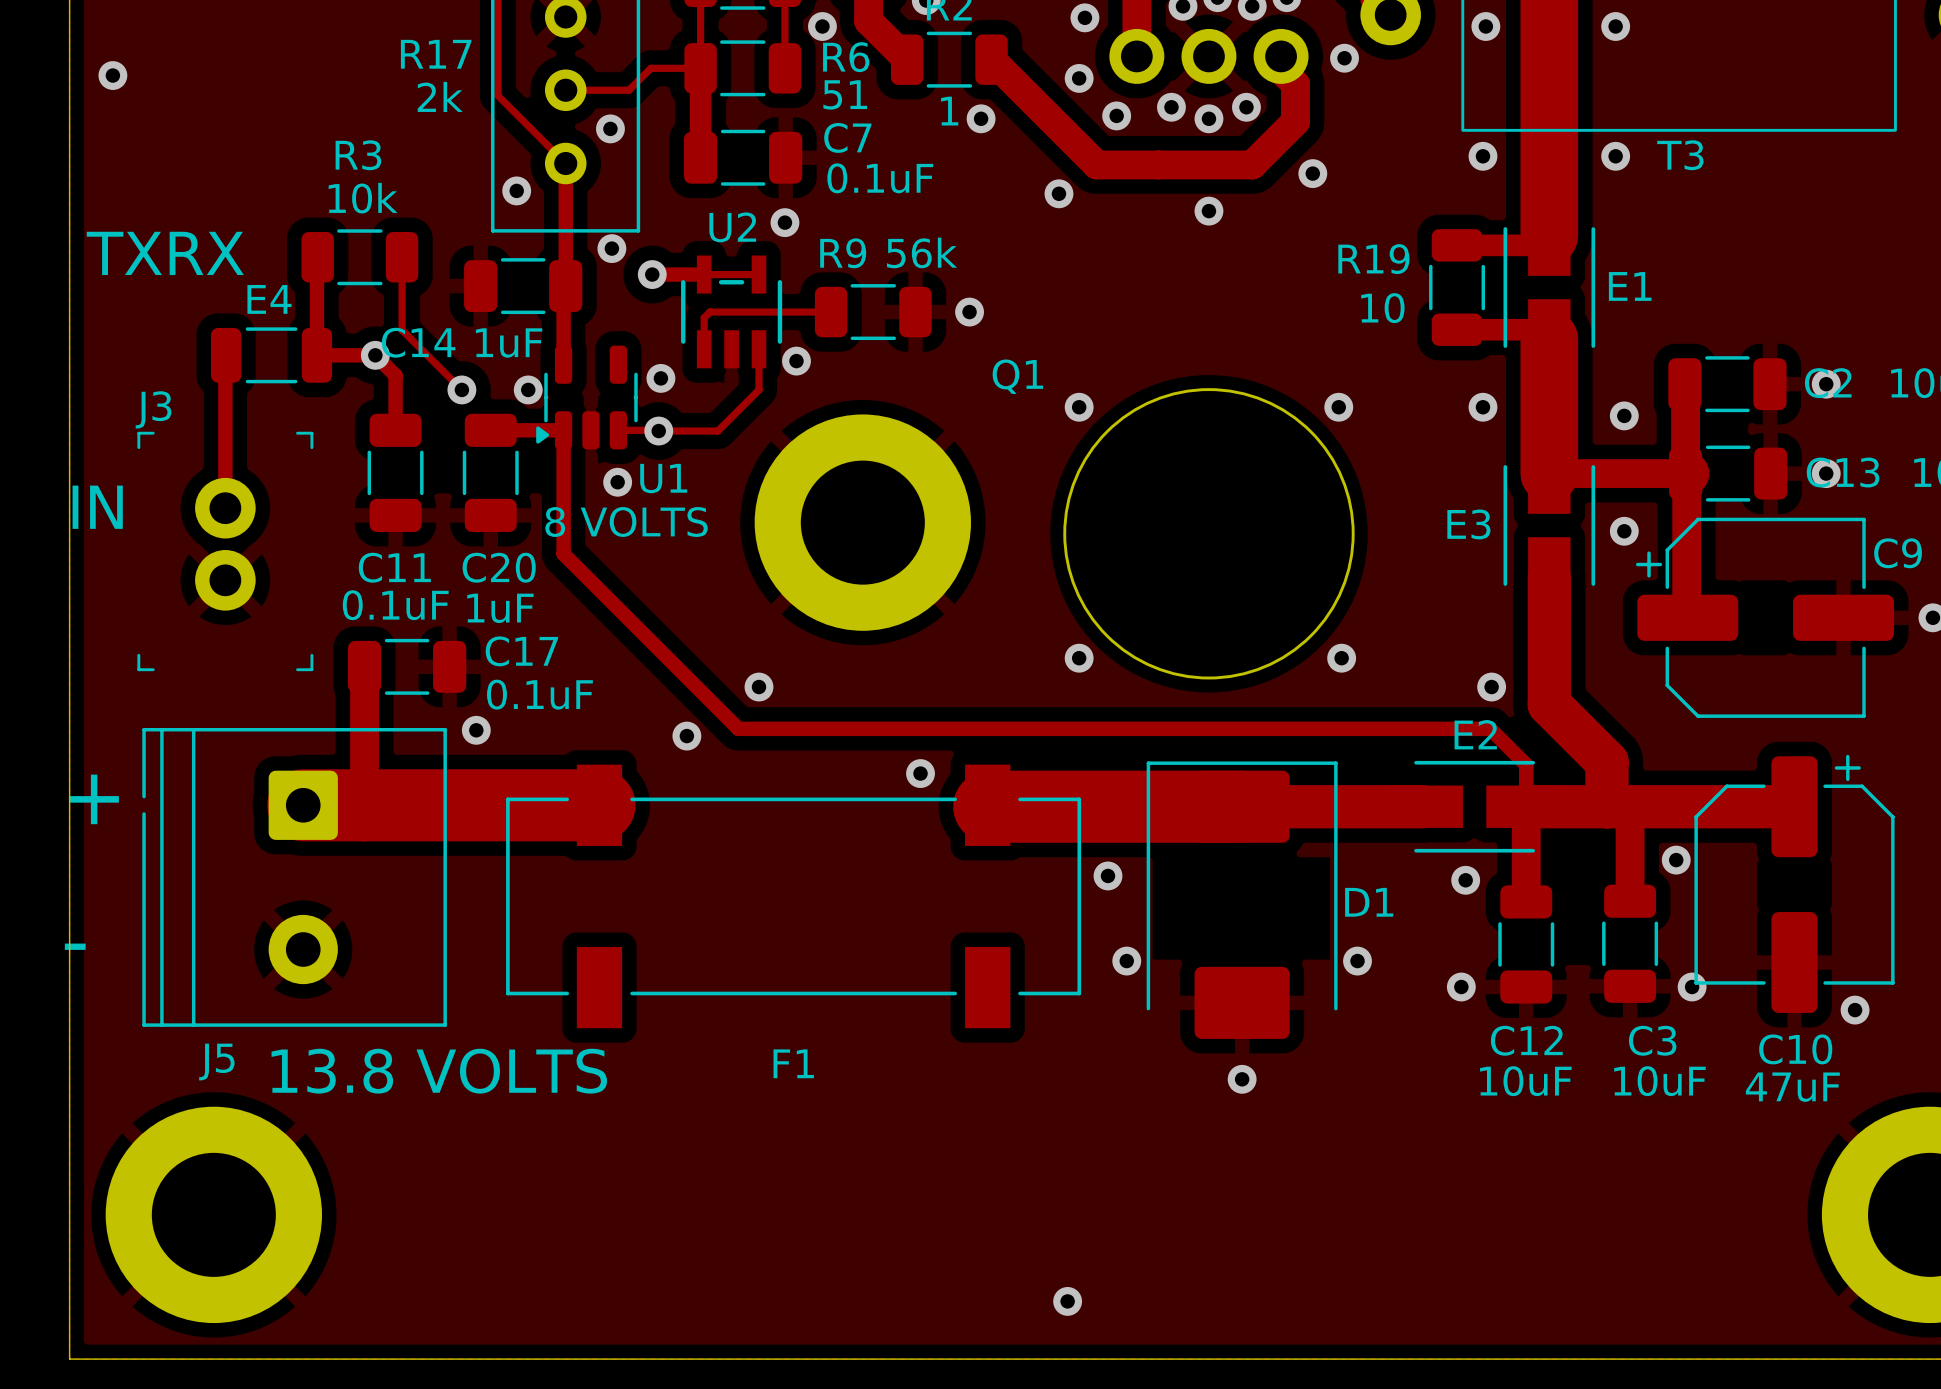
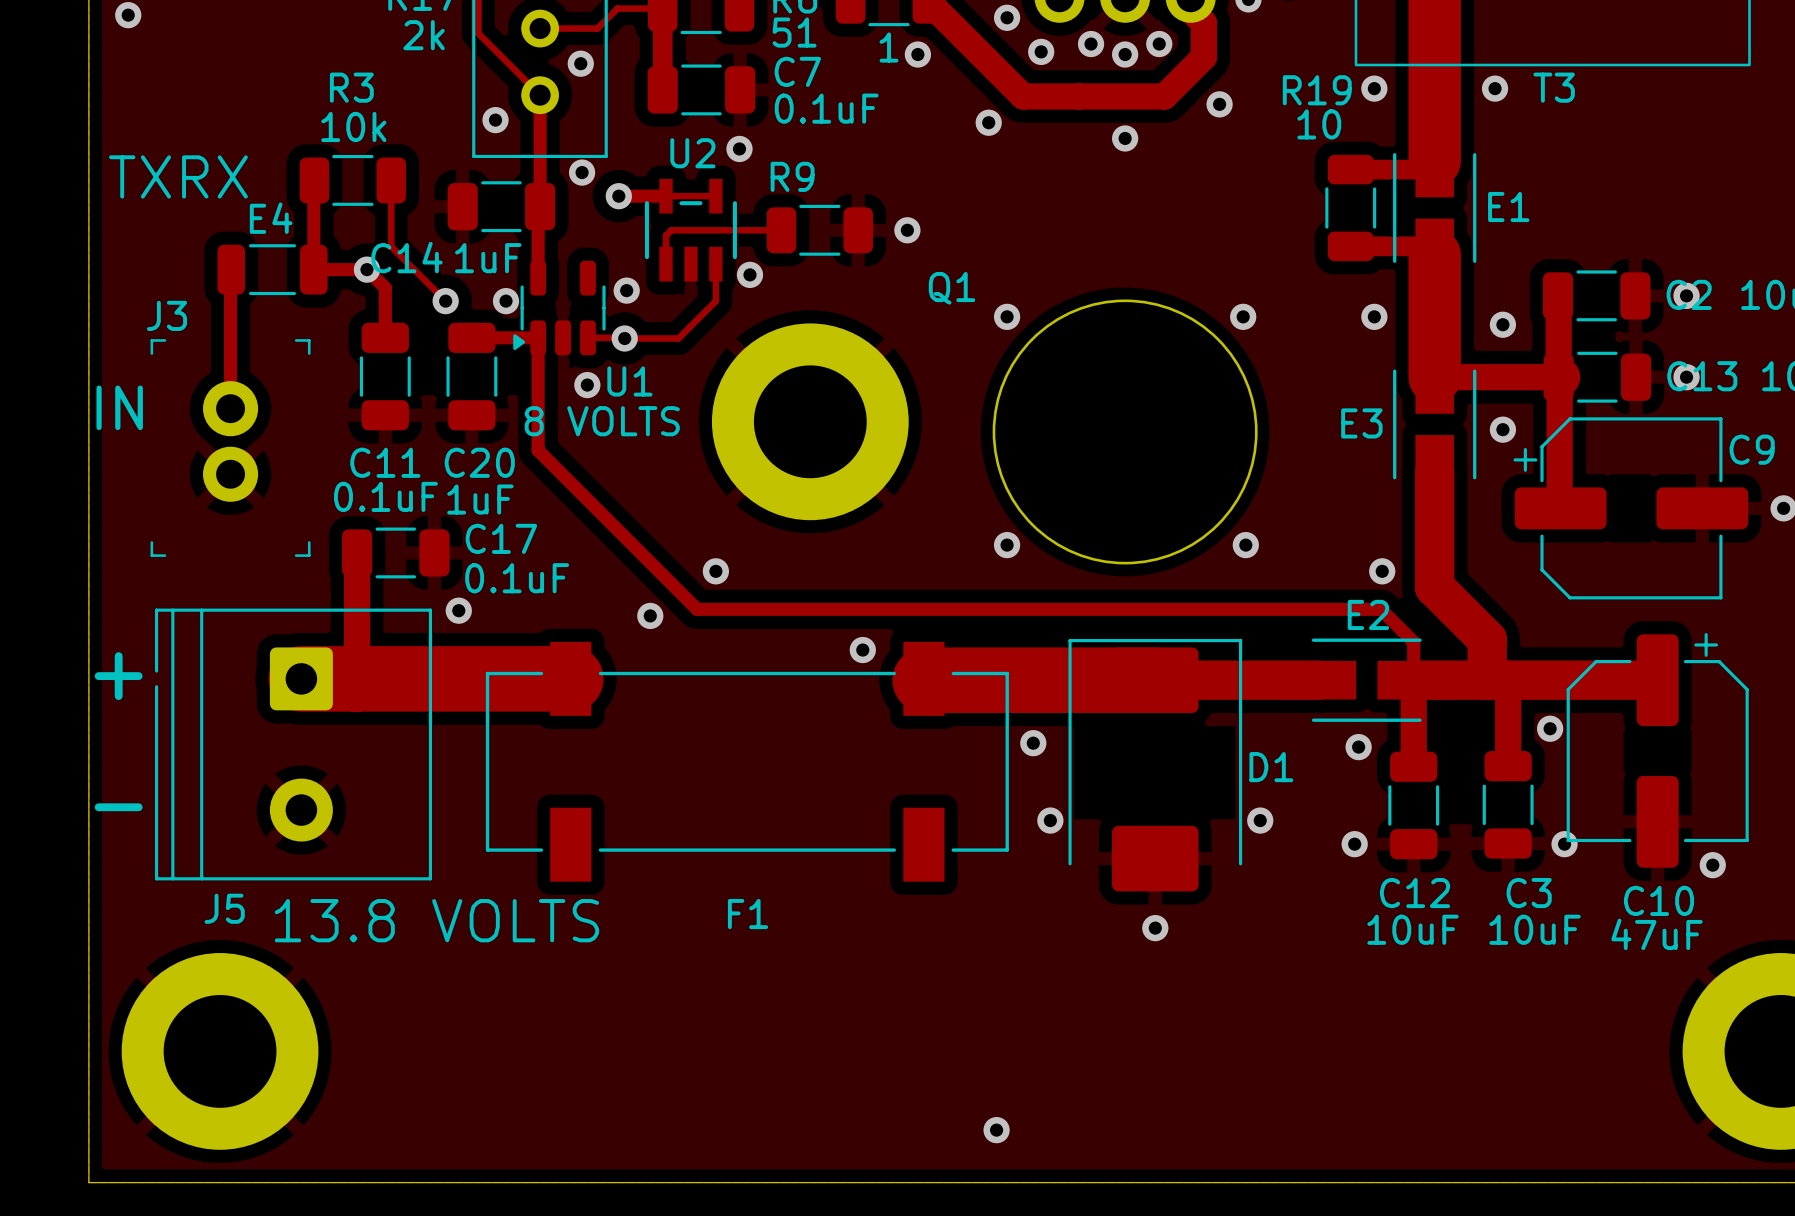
R9 value: 56k (921, 252) -> none
R19 name position: R19 (1373, 259) -> R19 (1317, 90)
R19 value position: 10 (1382, 308) -> 10 (1319, 124)

